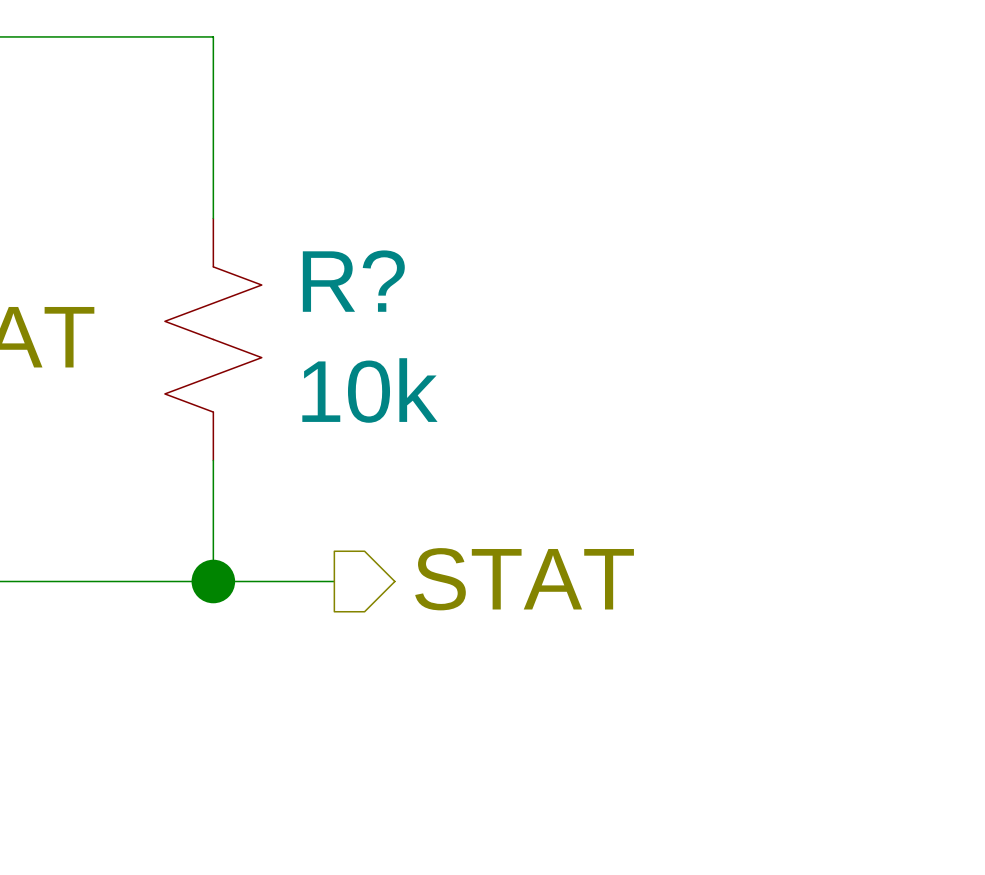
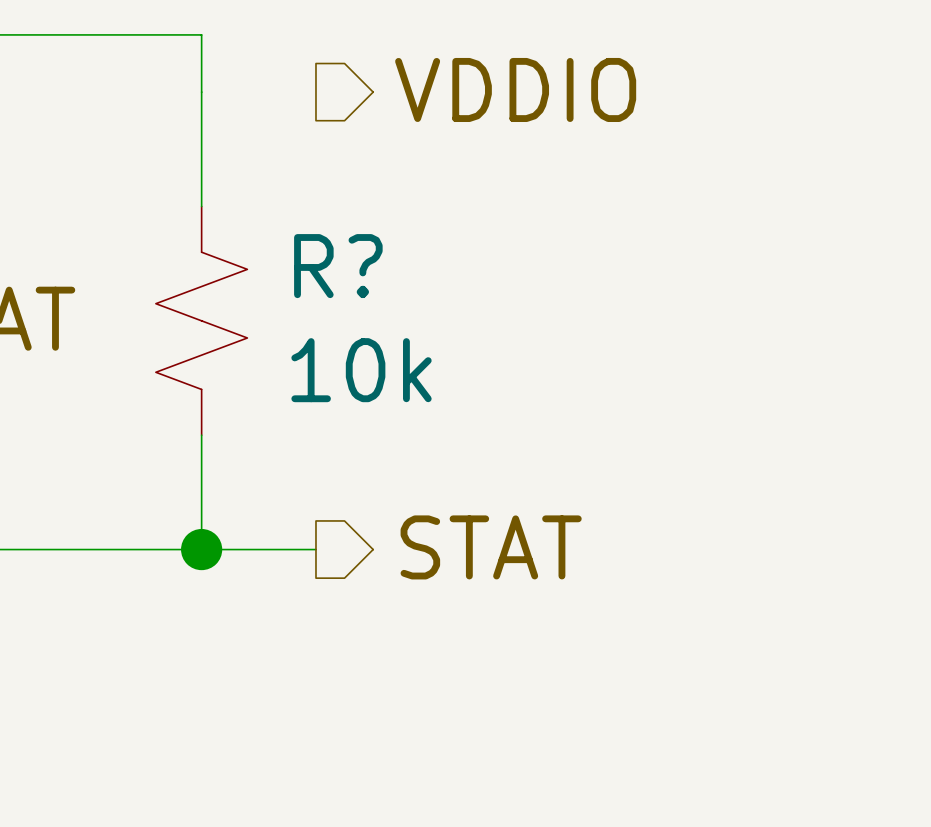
hierarchical label: none -> VDDIO (515, 89)

